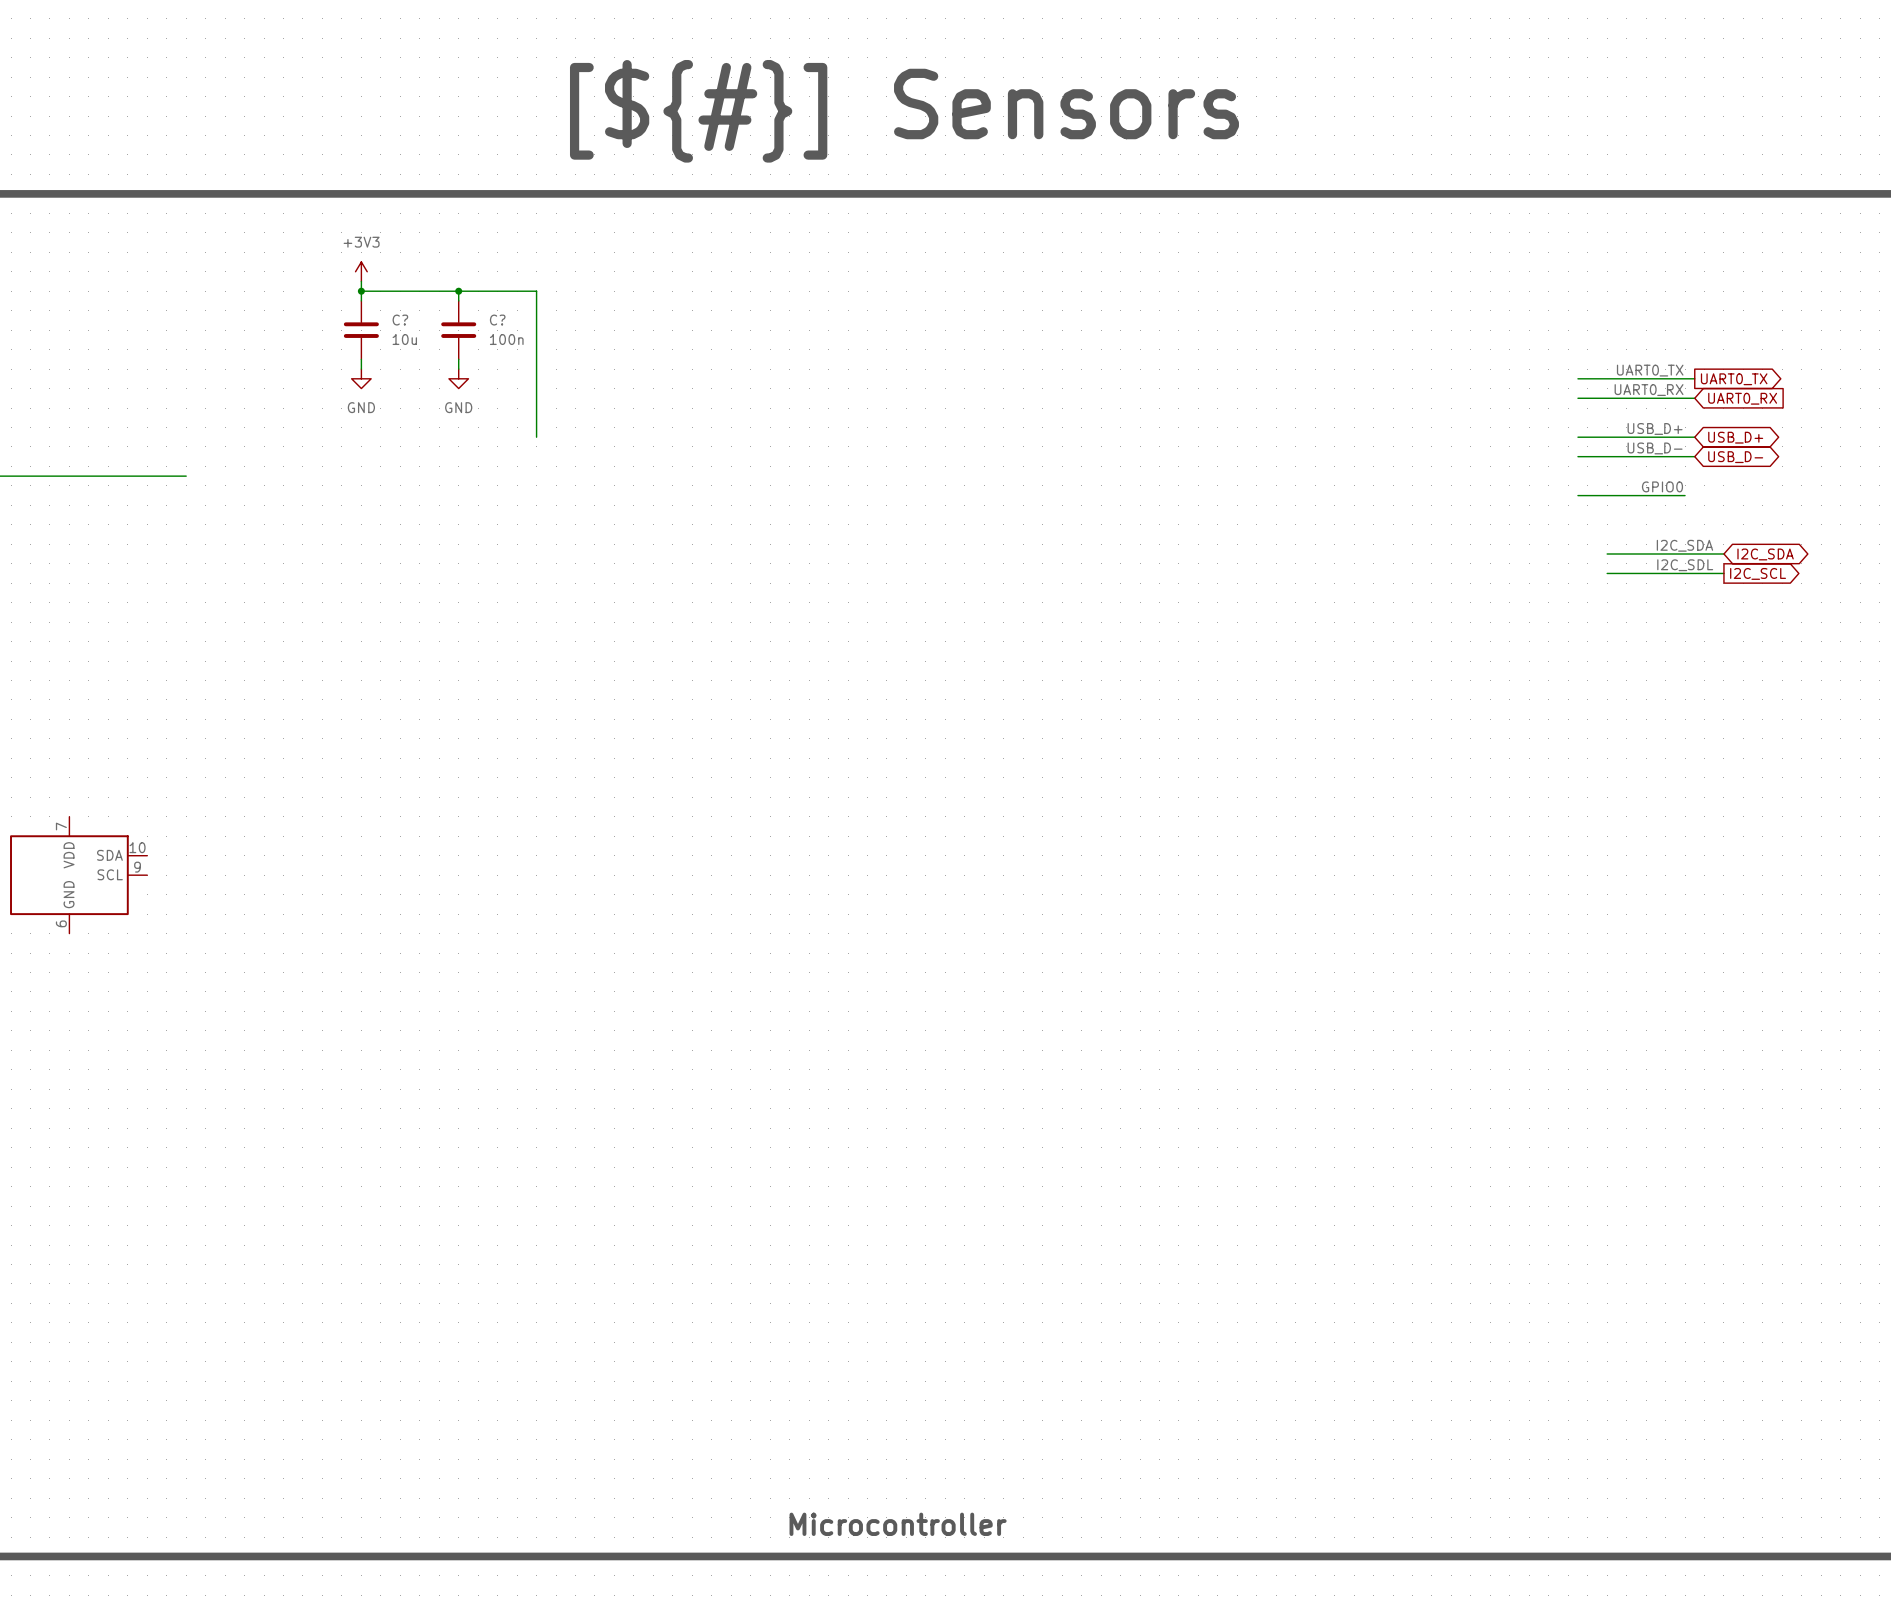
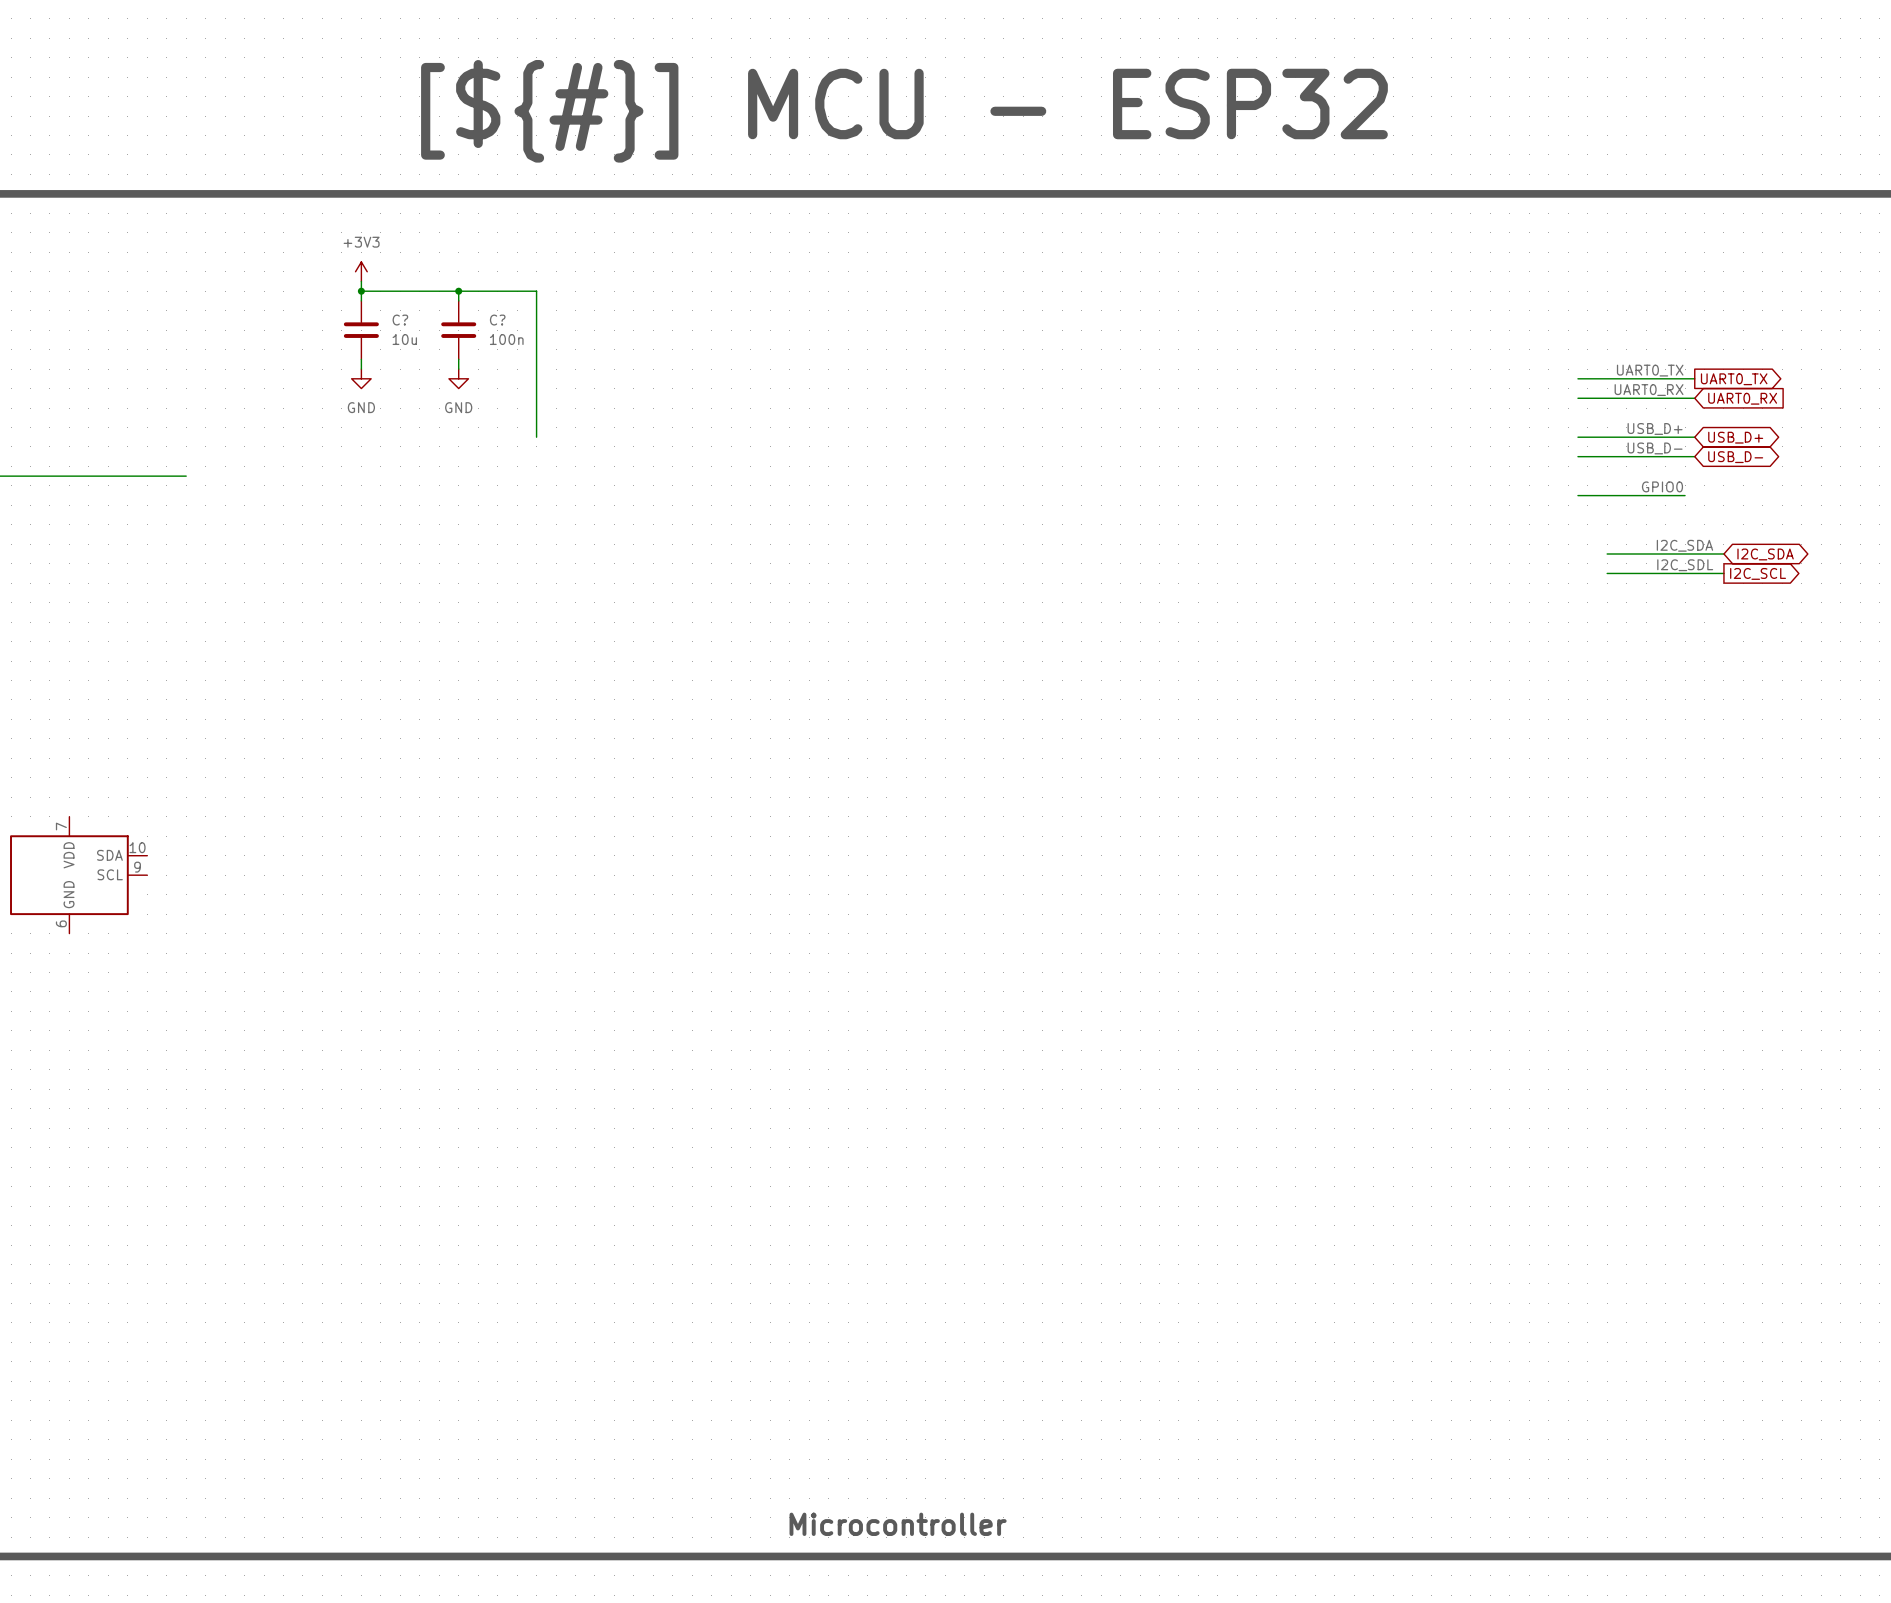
text: [${#}] Sensors (904, 111) -> [${#}] MCU - ESP32 (904, 111)

